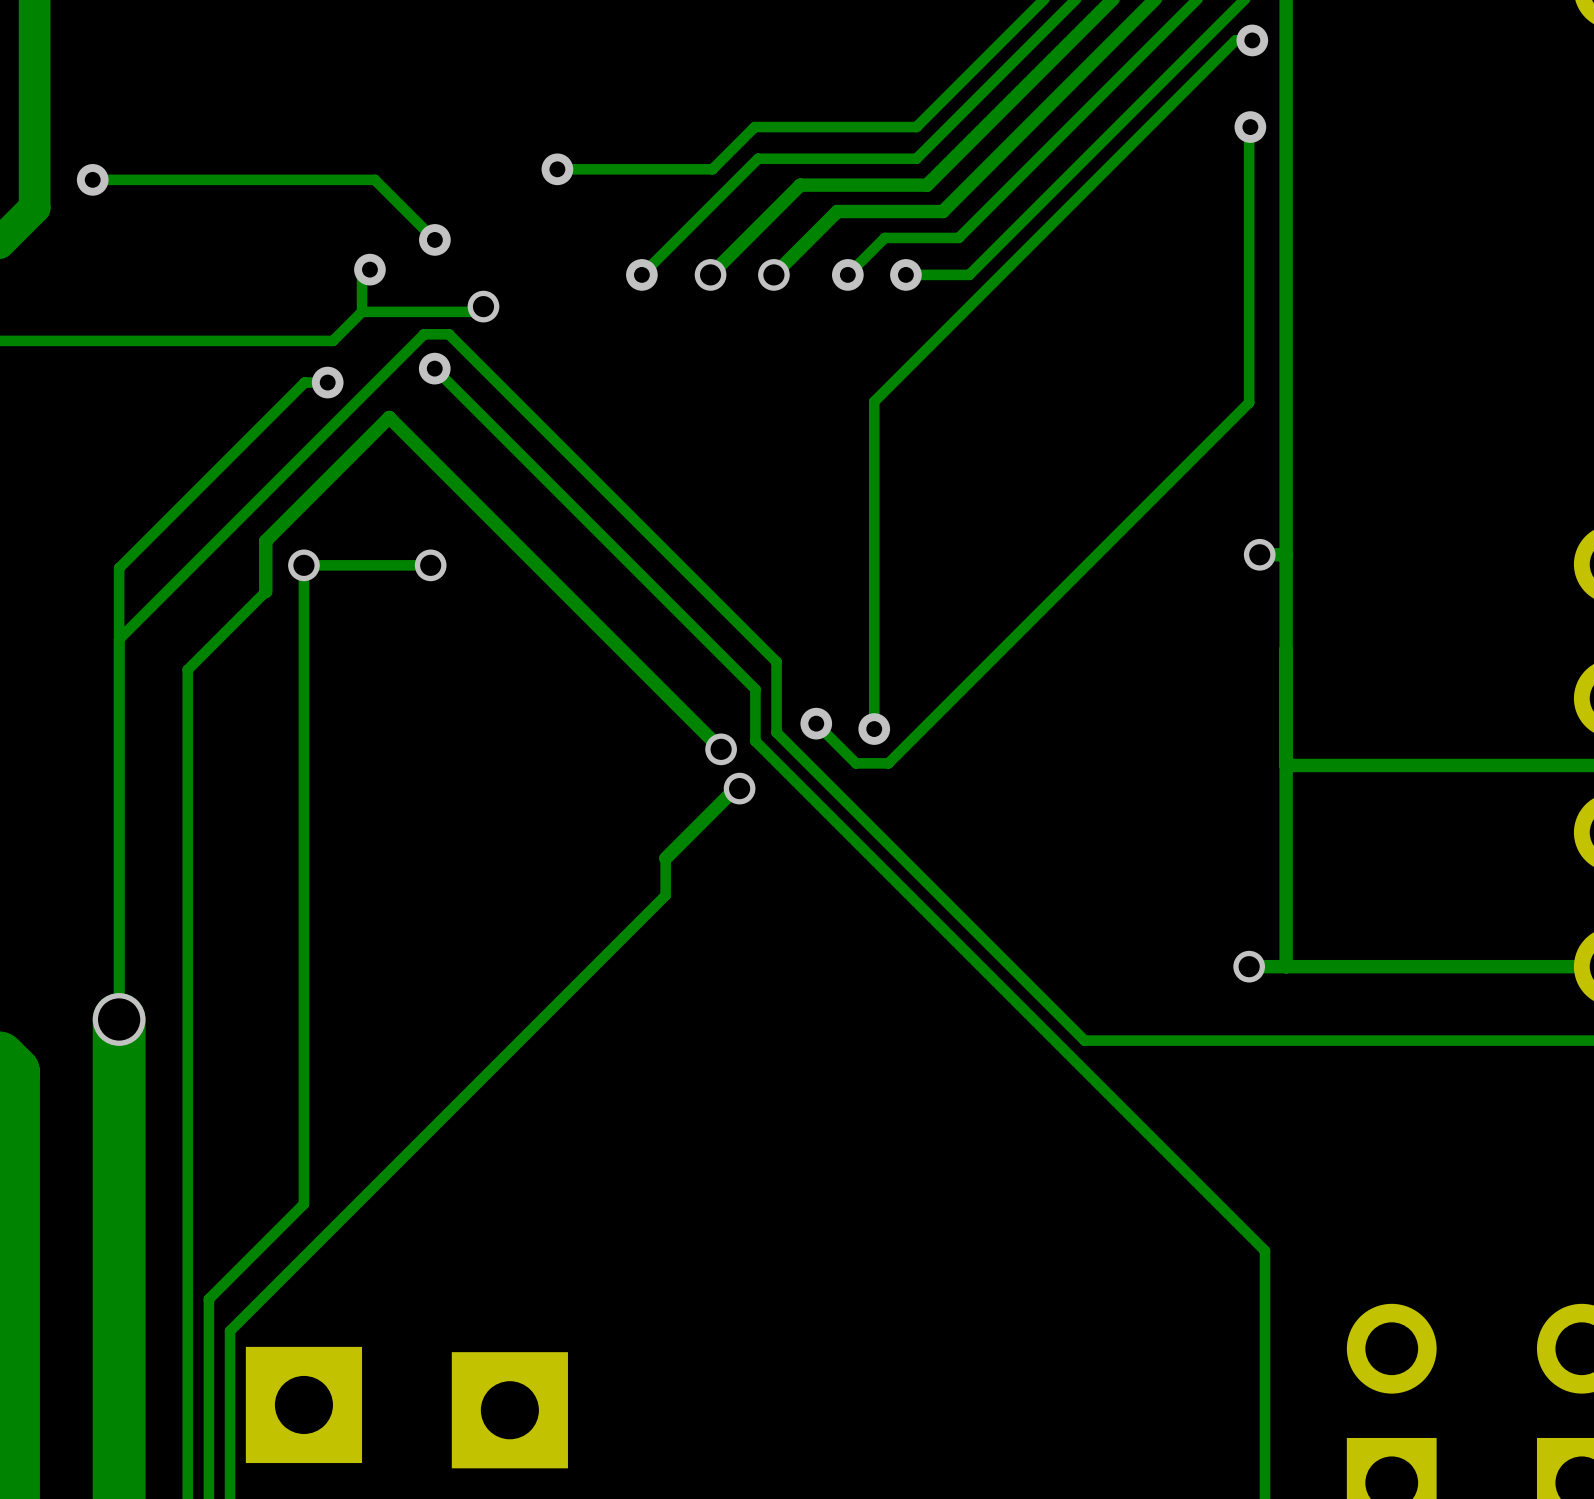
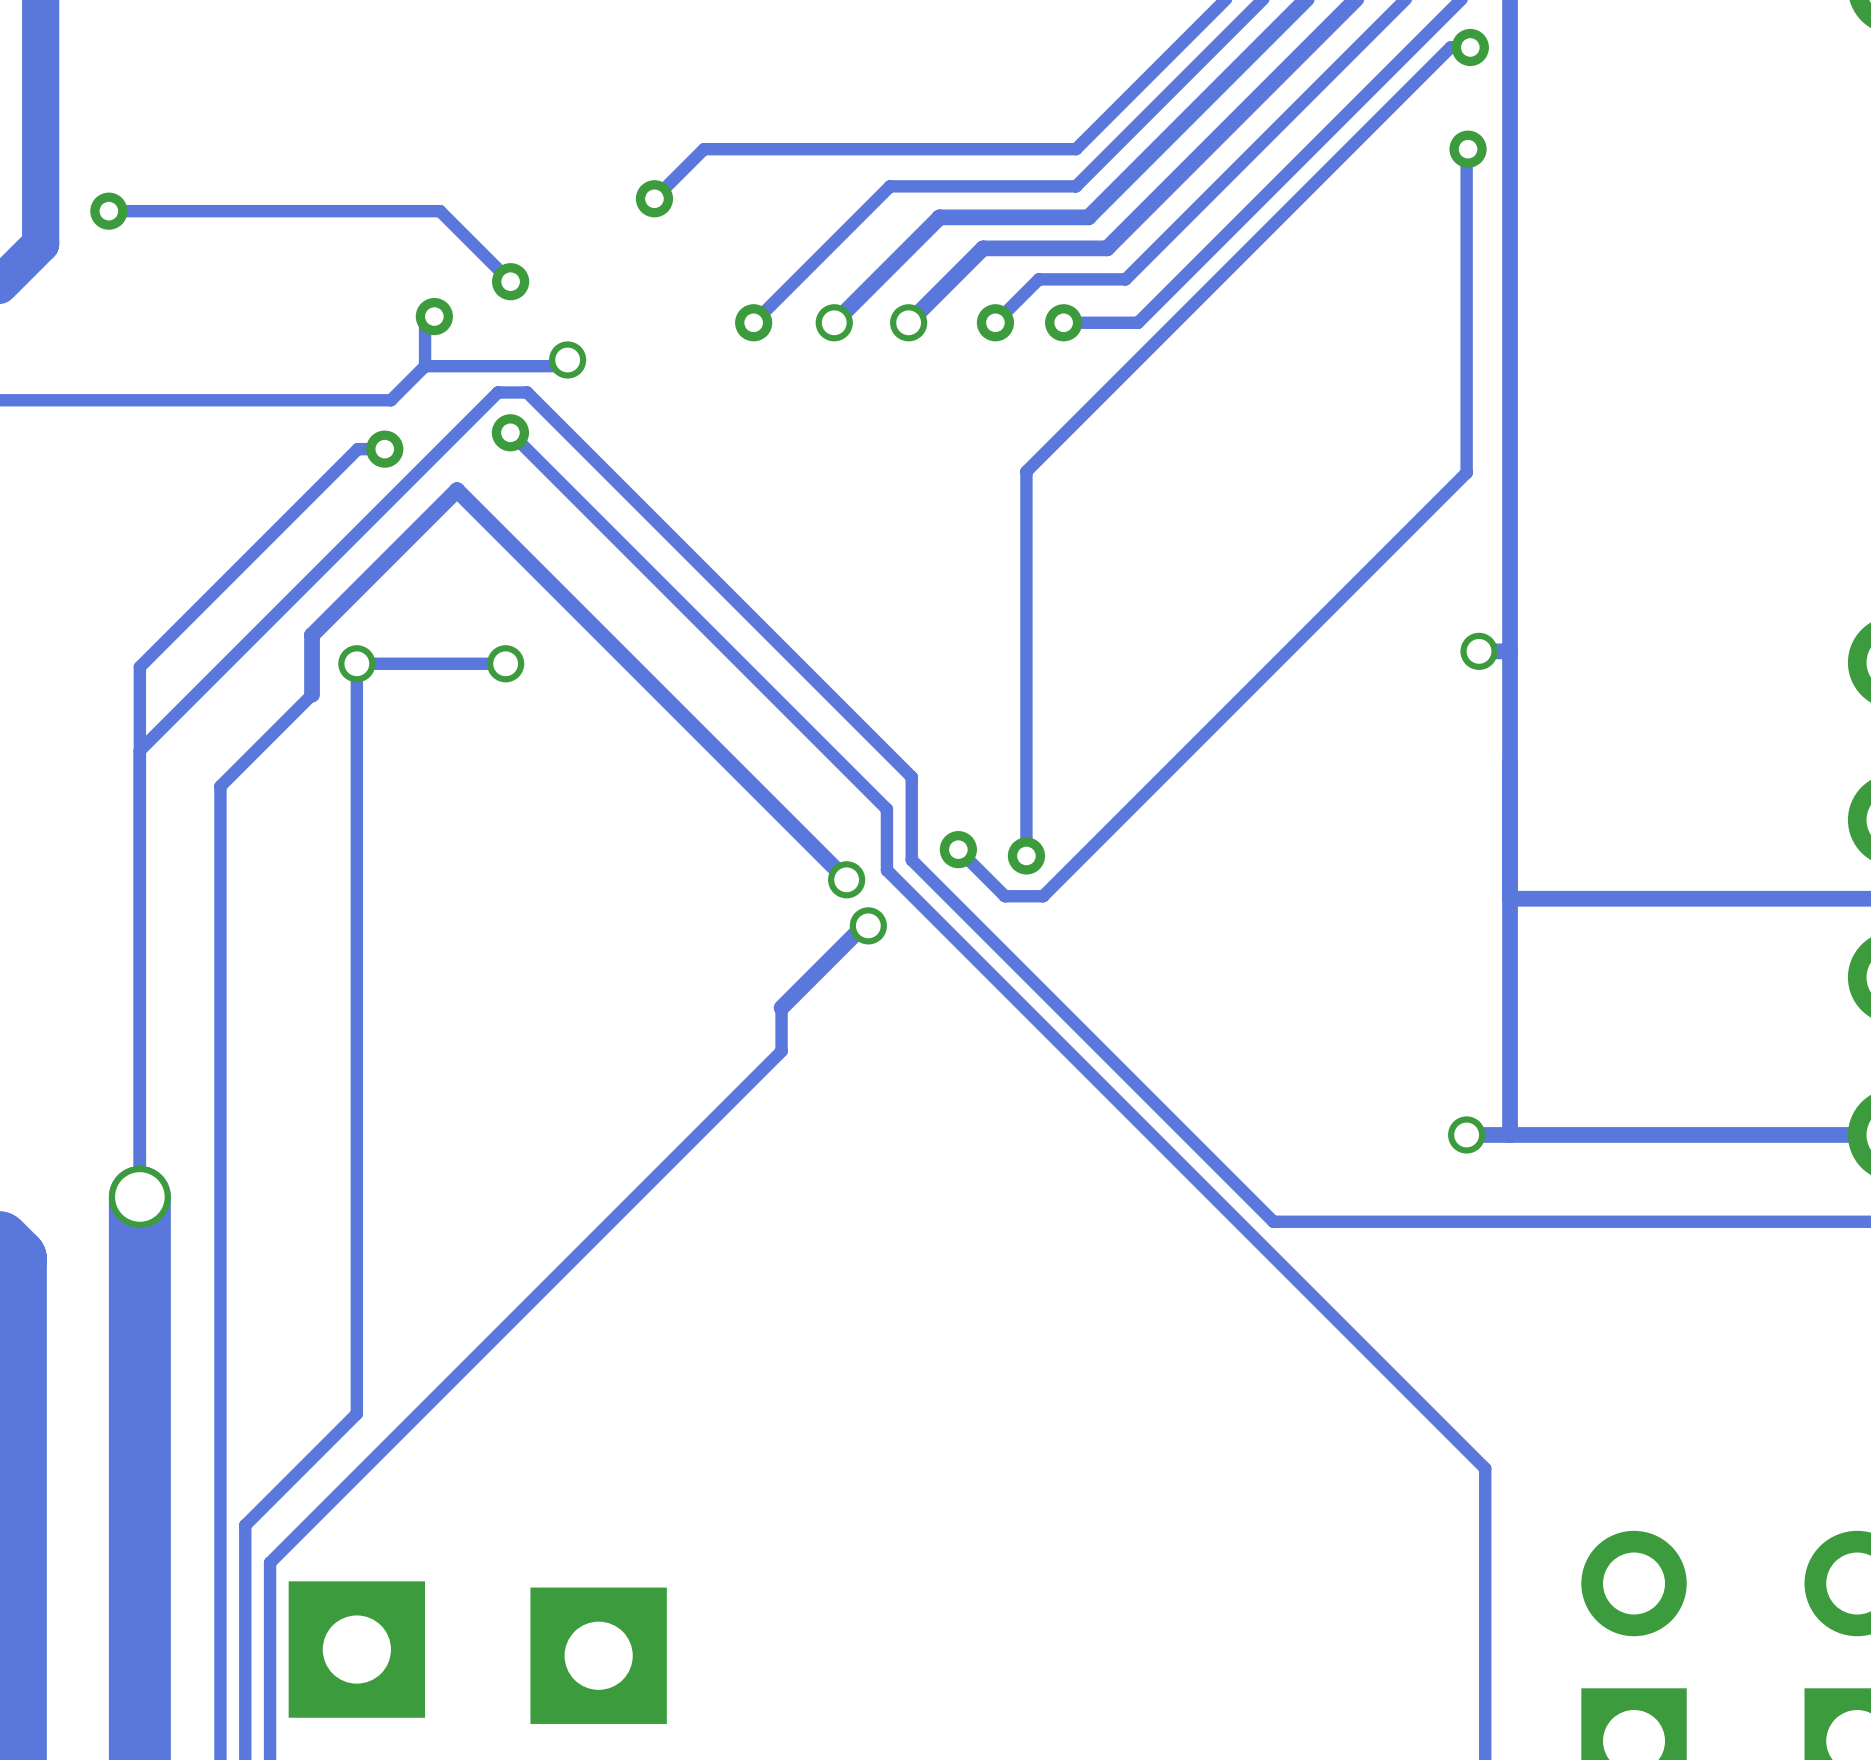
track: (754, 127) (712, 169) (557, 169) -> (886, 149) (704, 149) (654, 198)

